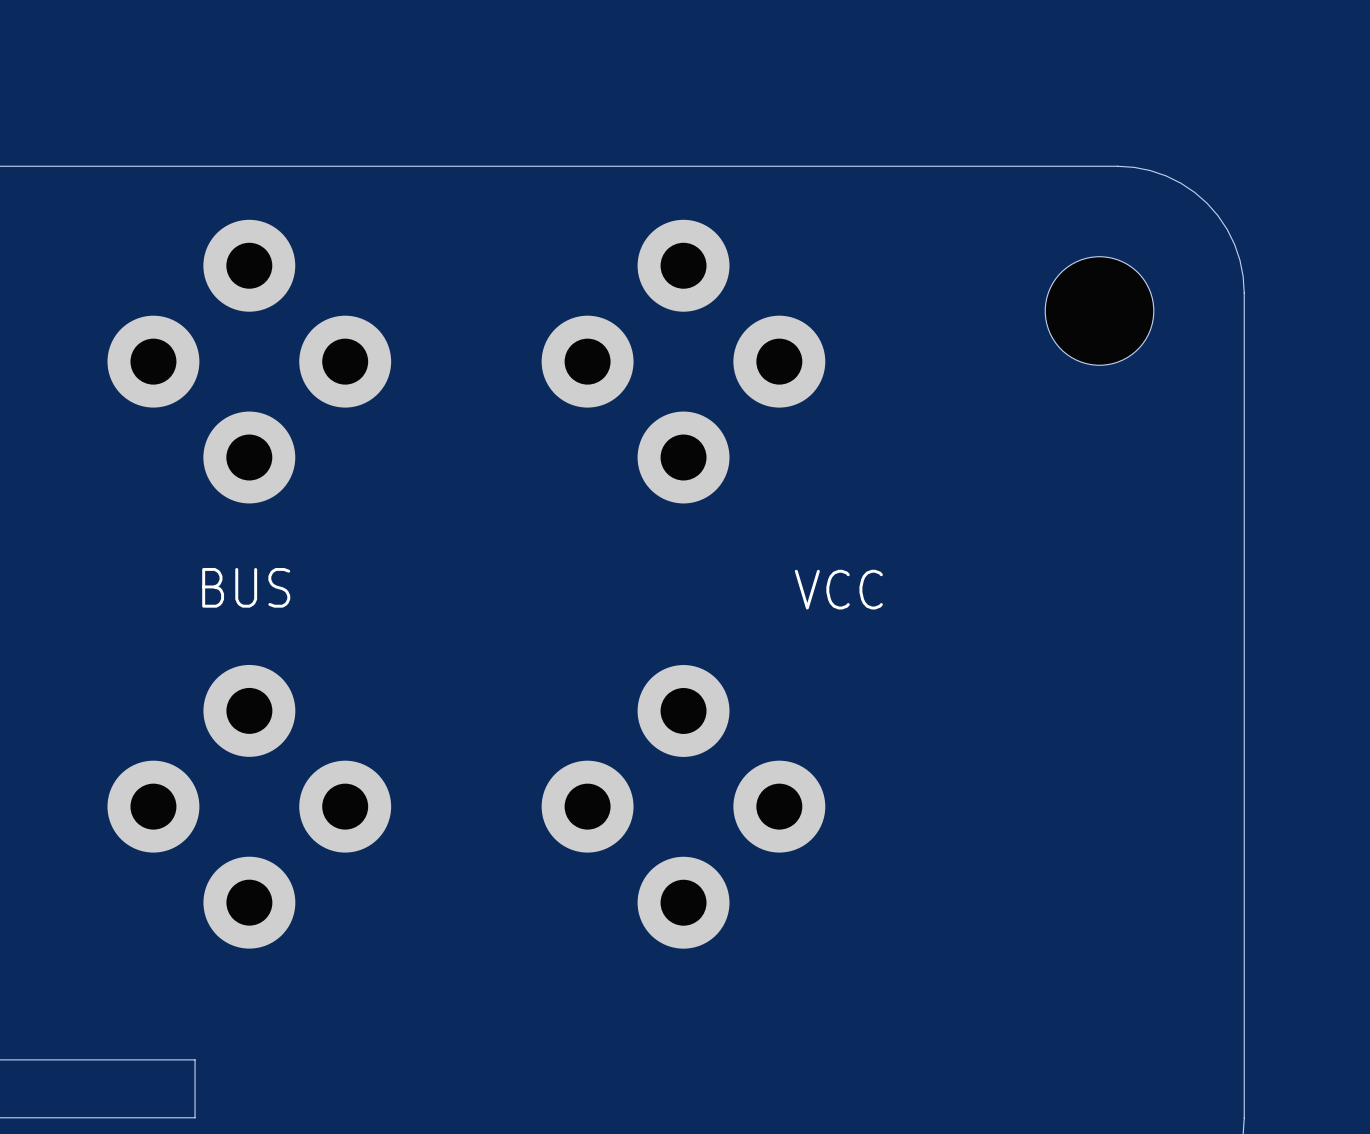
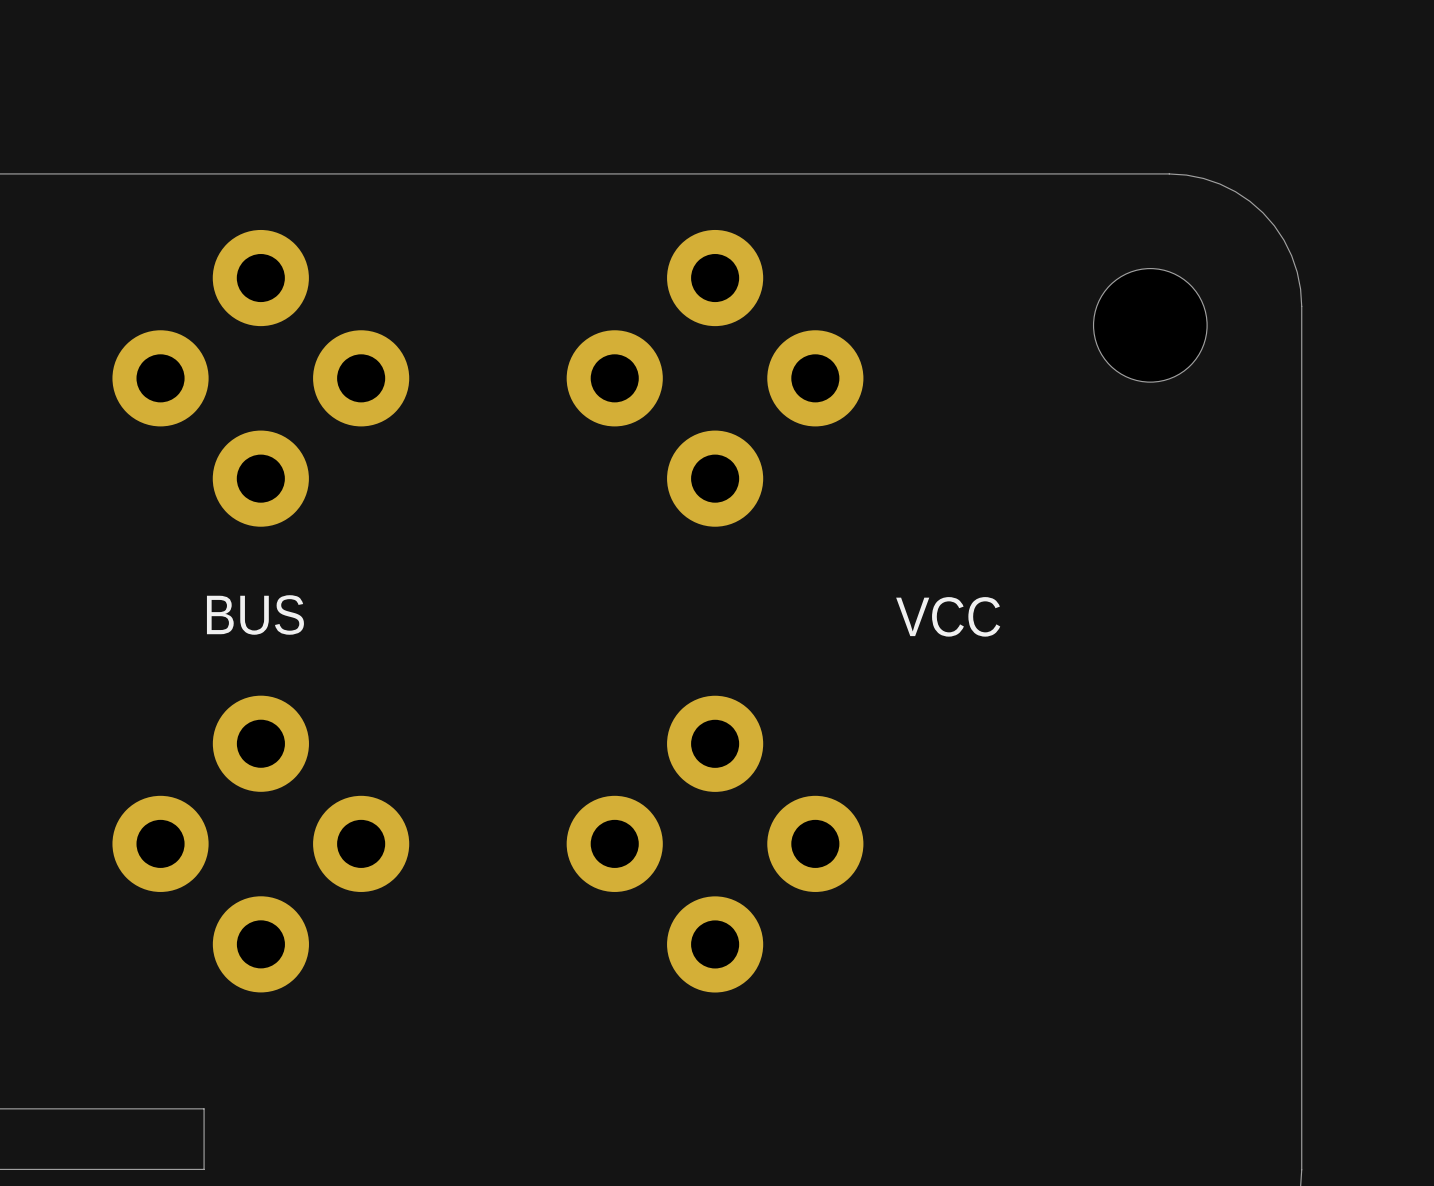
text position: VCC (838, 589) -> VCC (948, 616)

